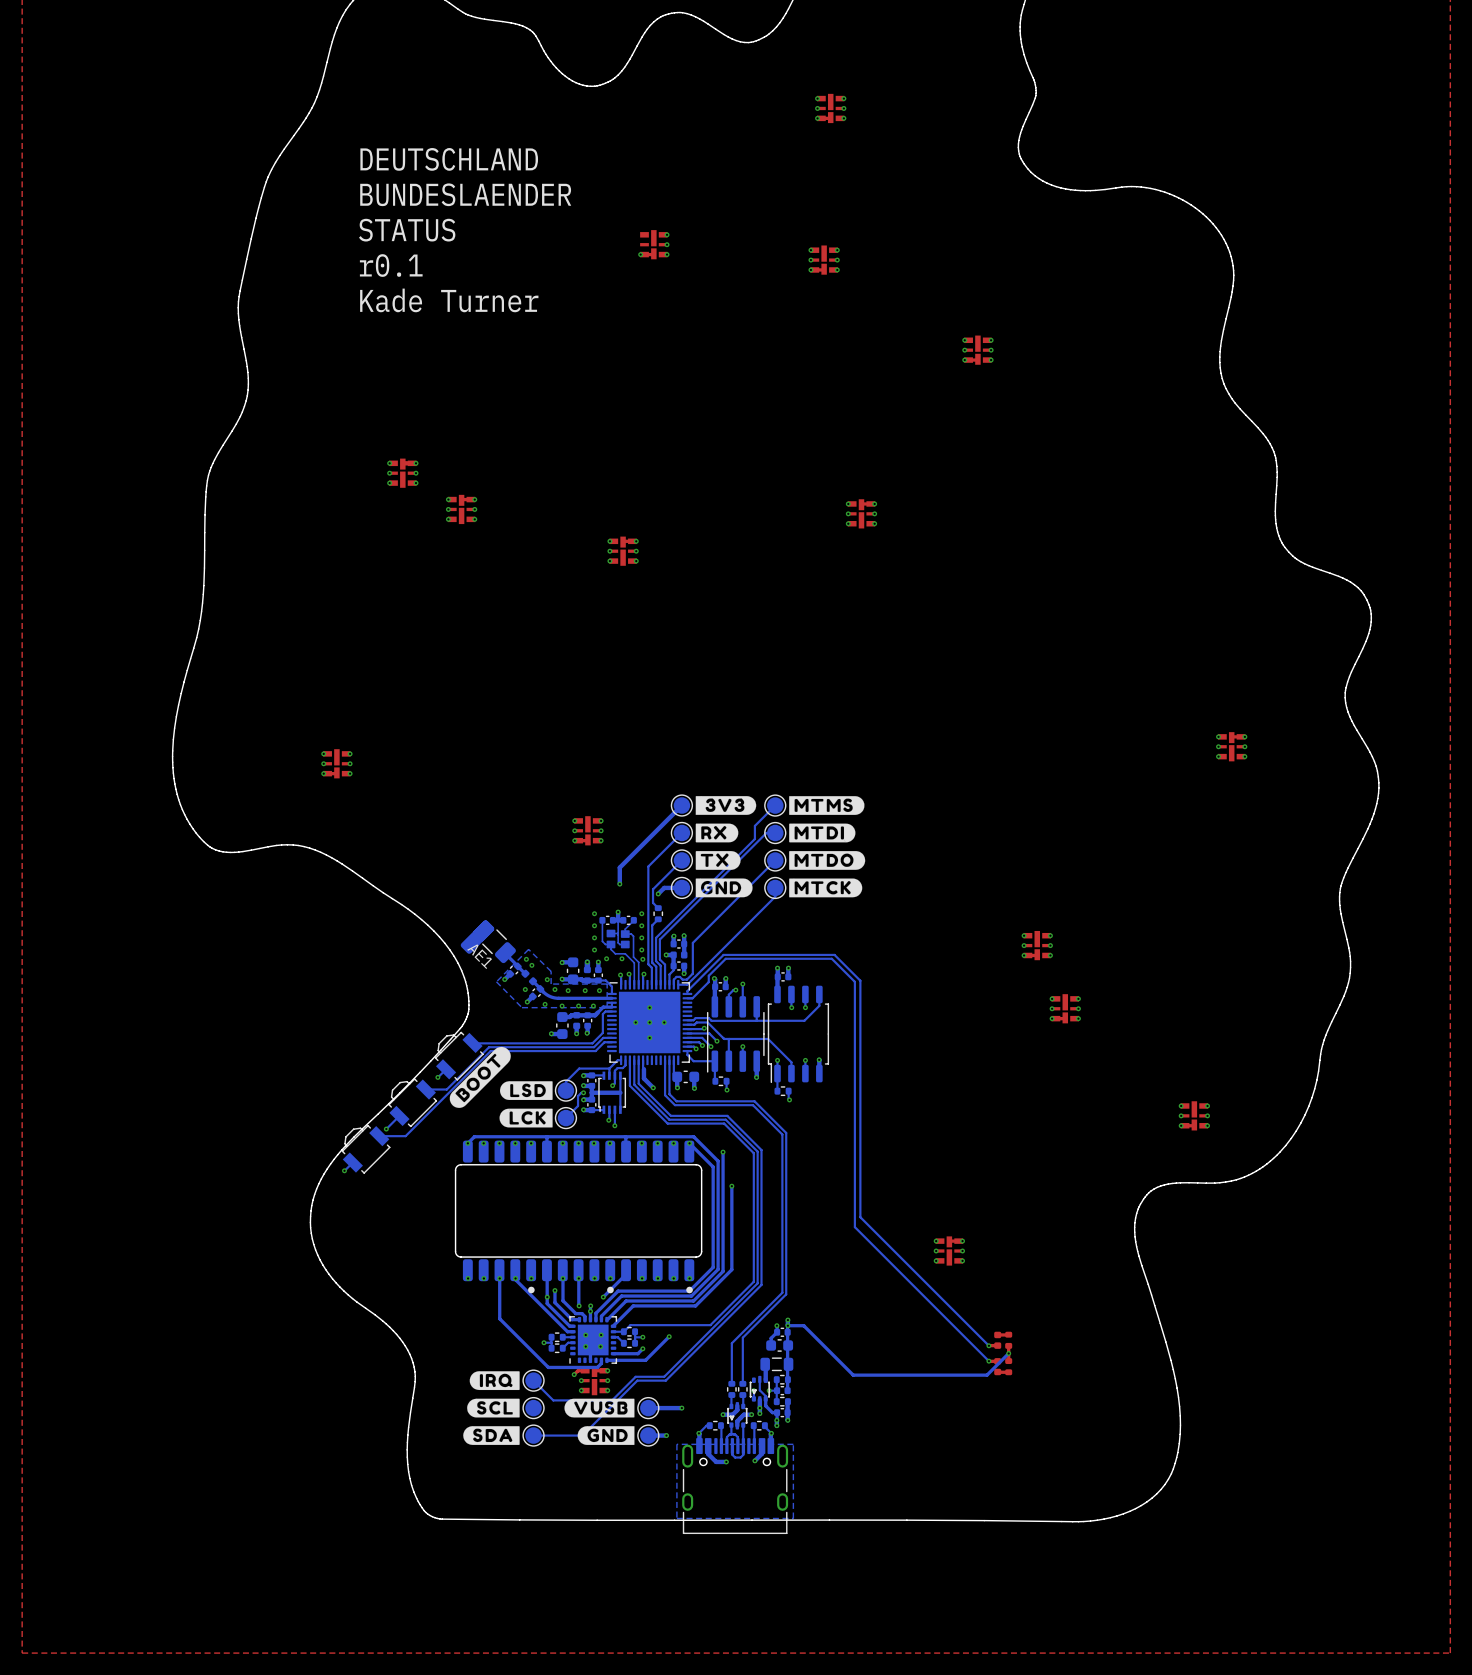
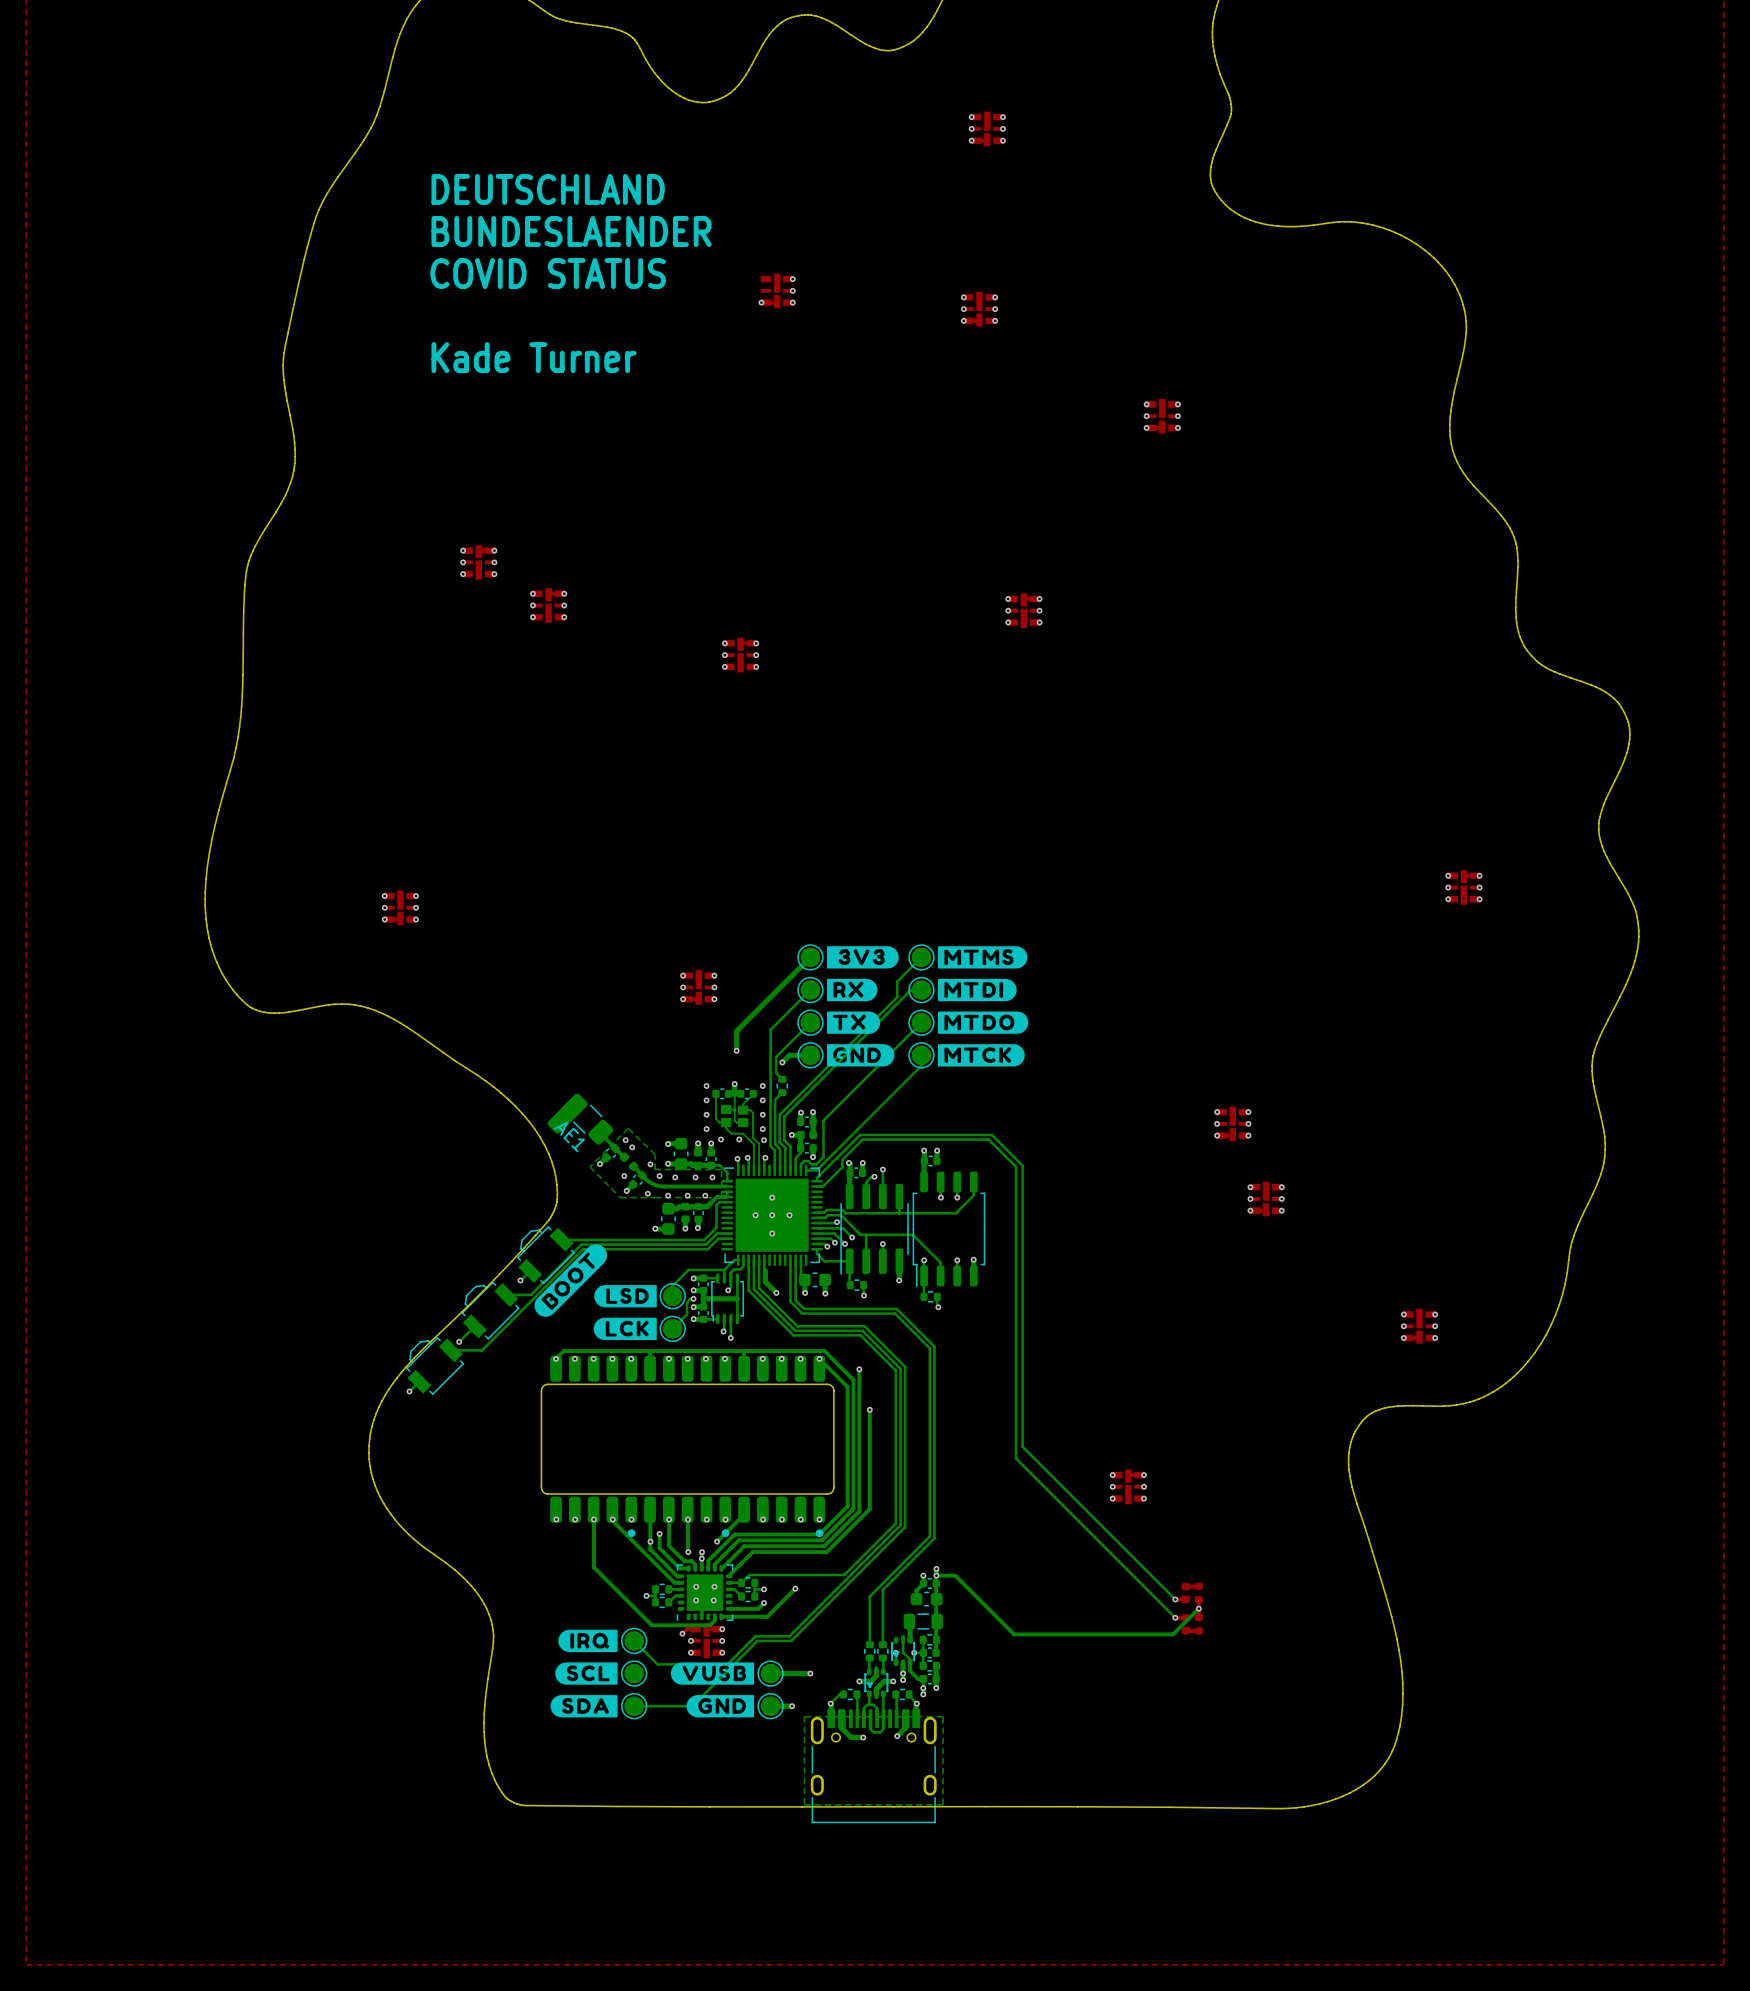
text: STATUS (407, 230) -> COVID STATUS (548, 273)
text: r0.1 (391, 265) -> none

